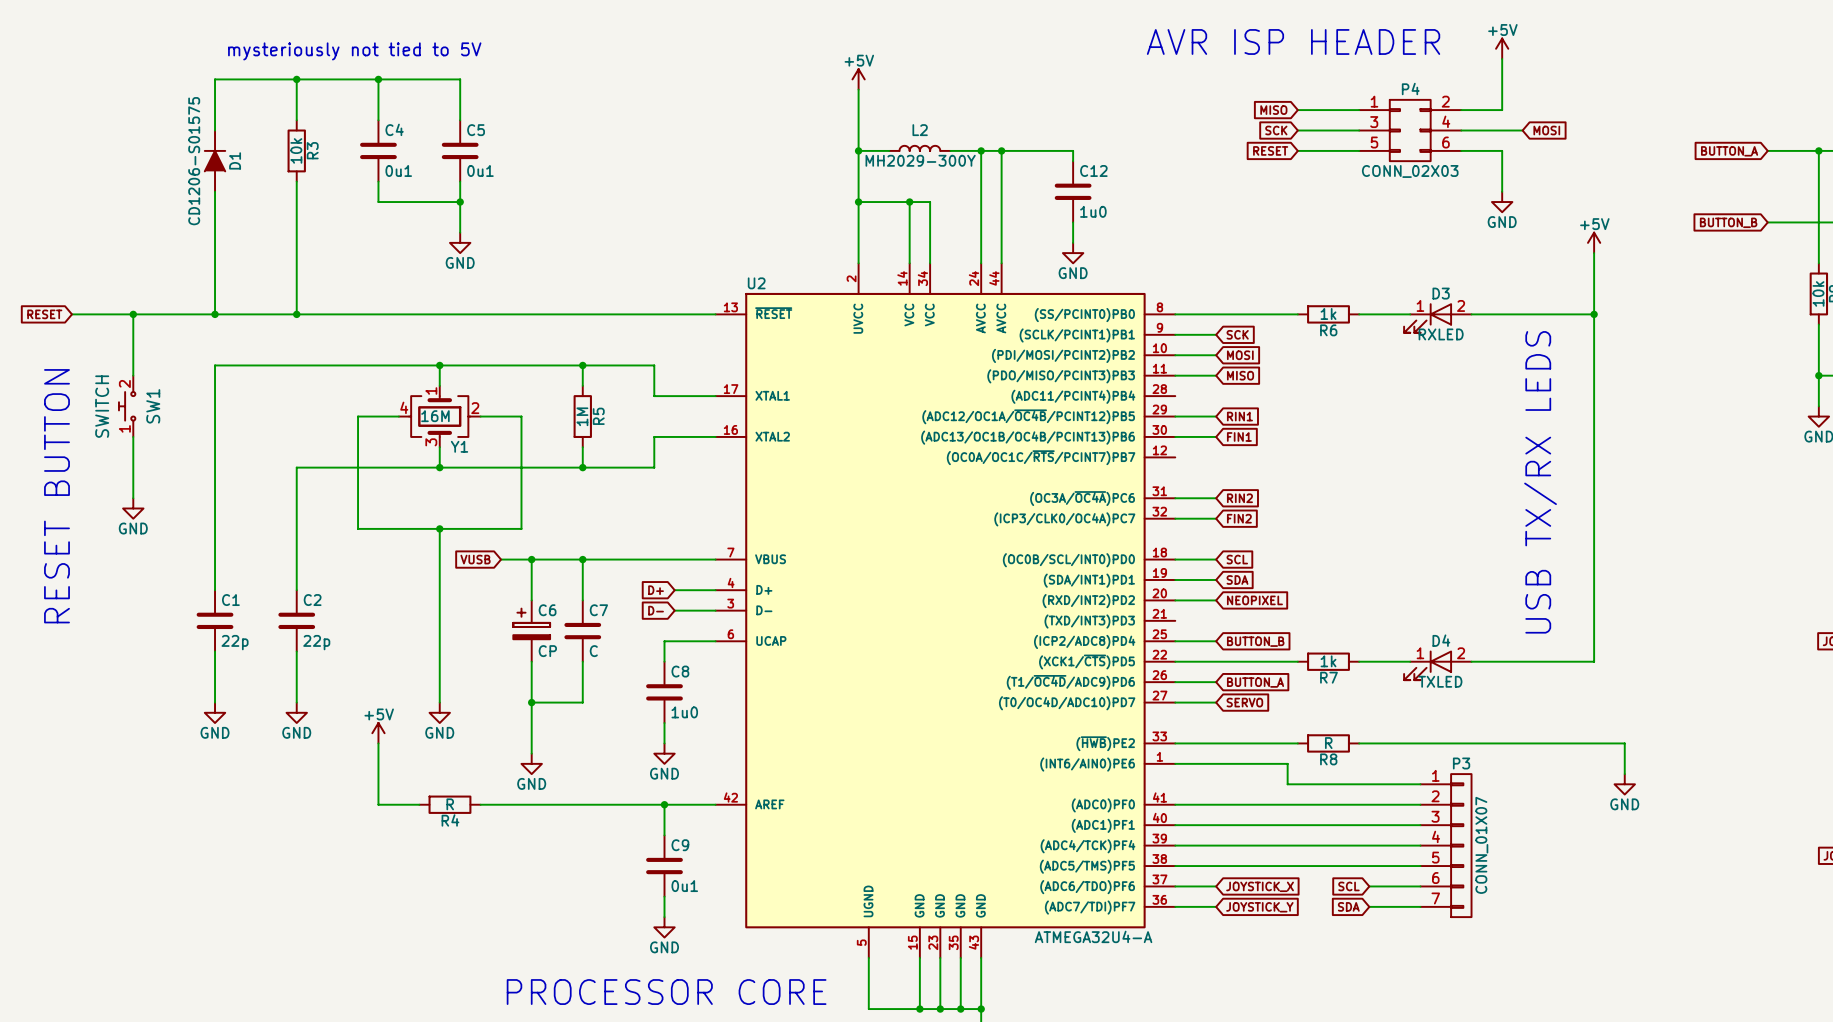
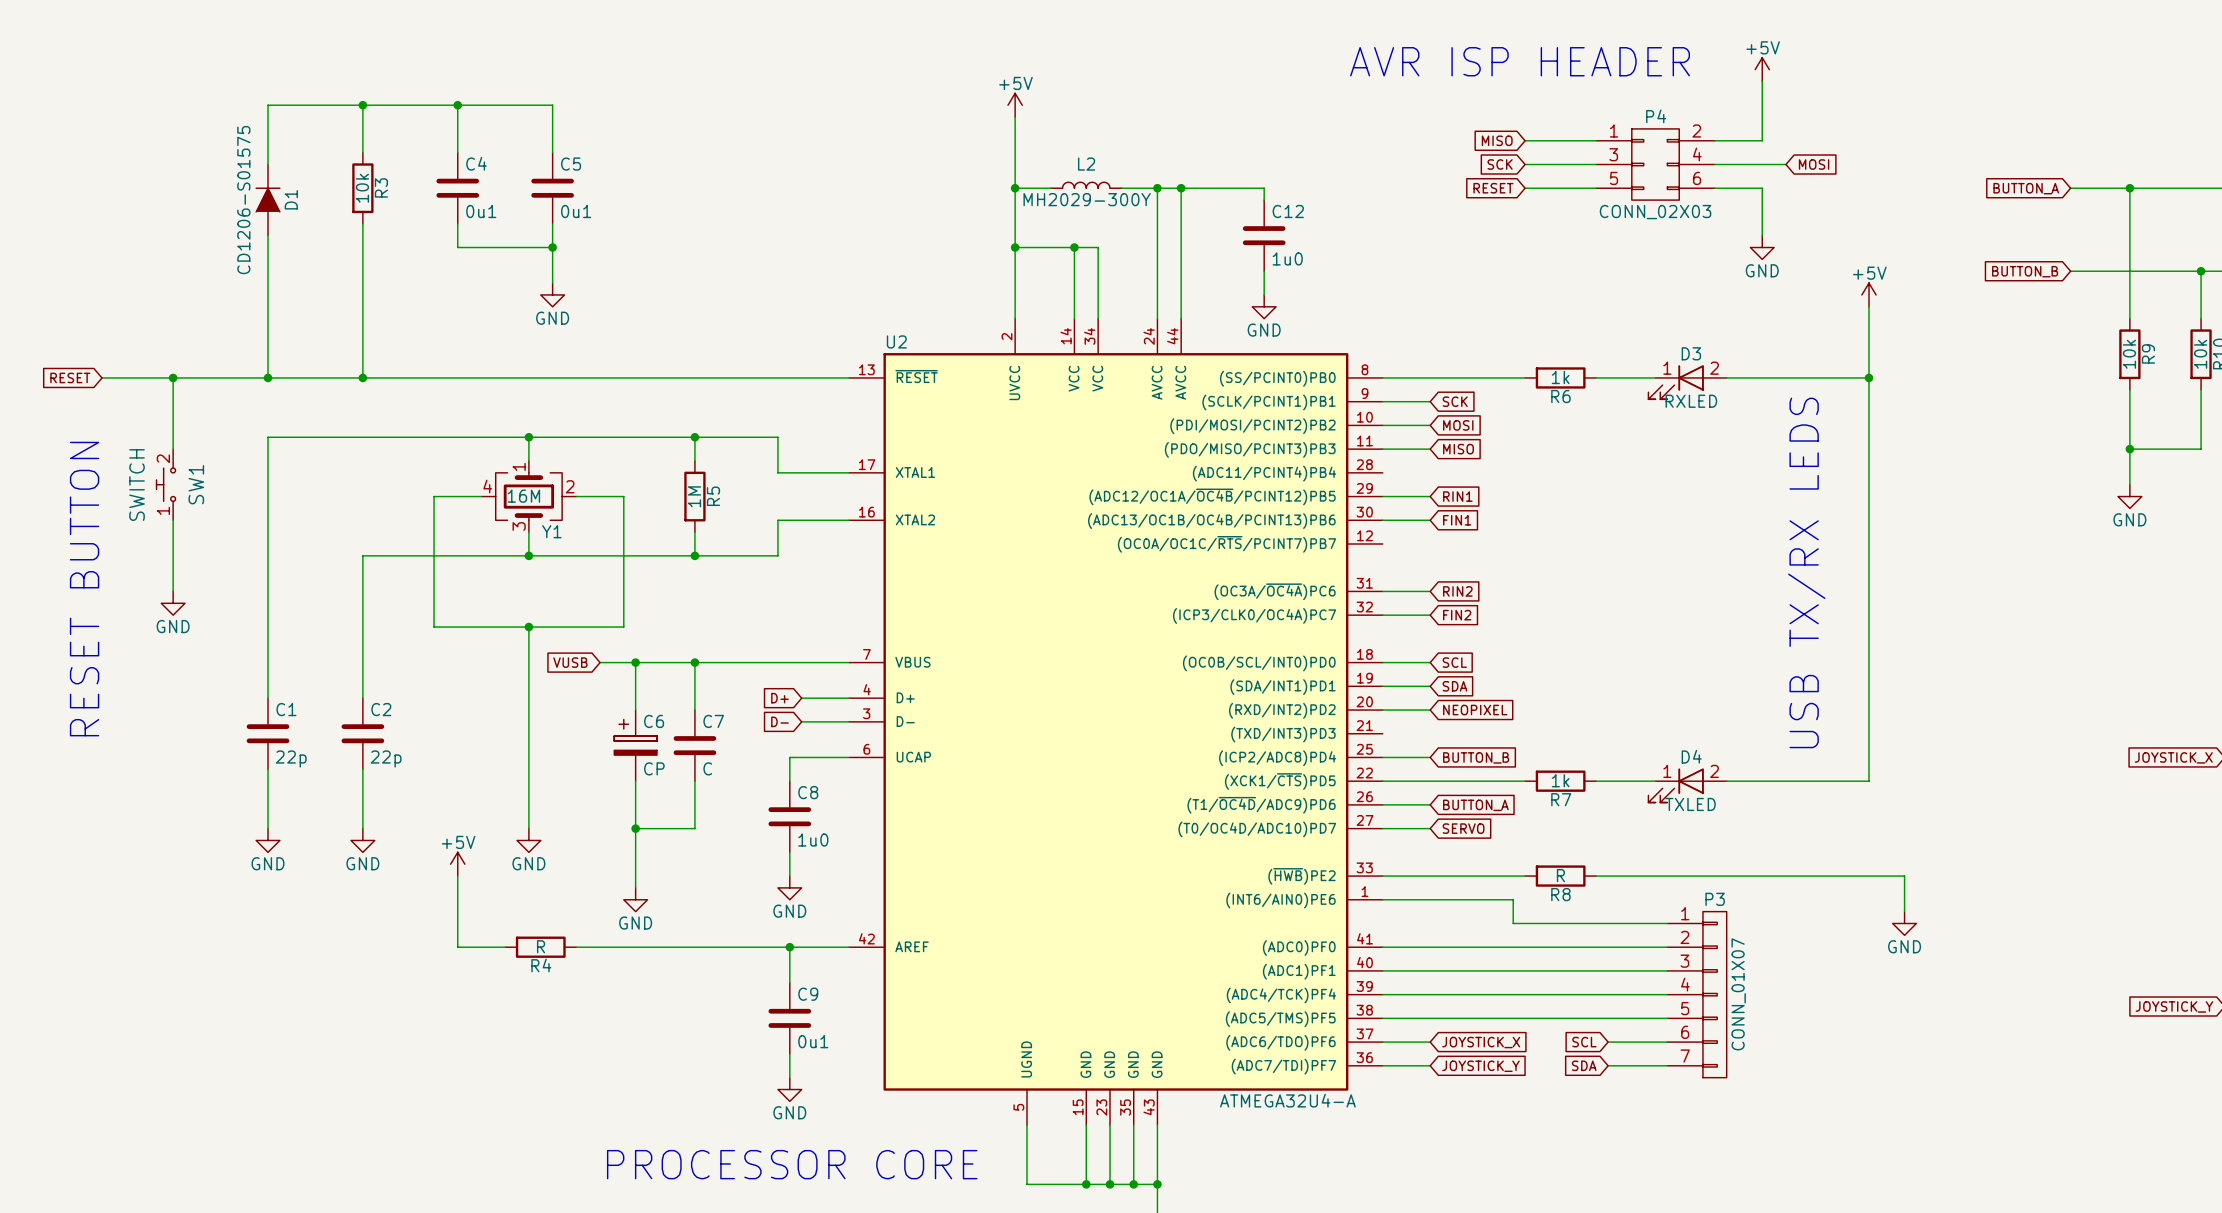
text: mysteriously not tied to 5V (354, 51) -> none

